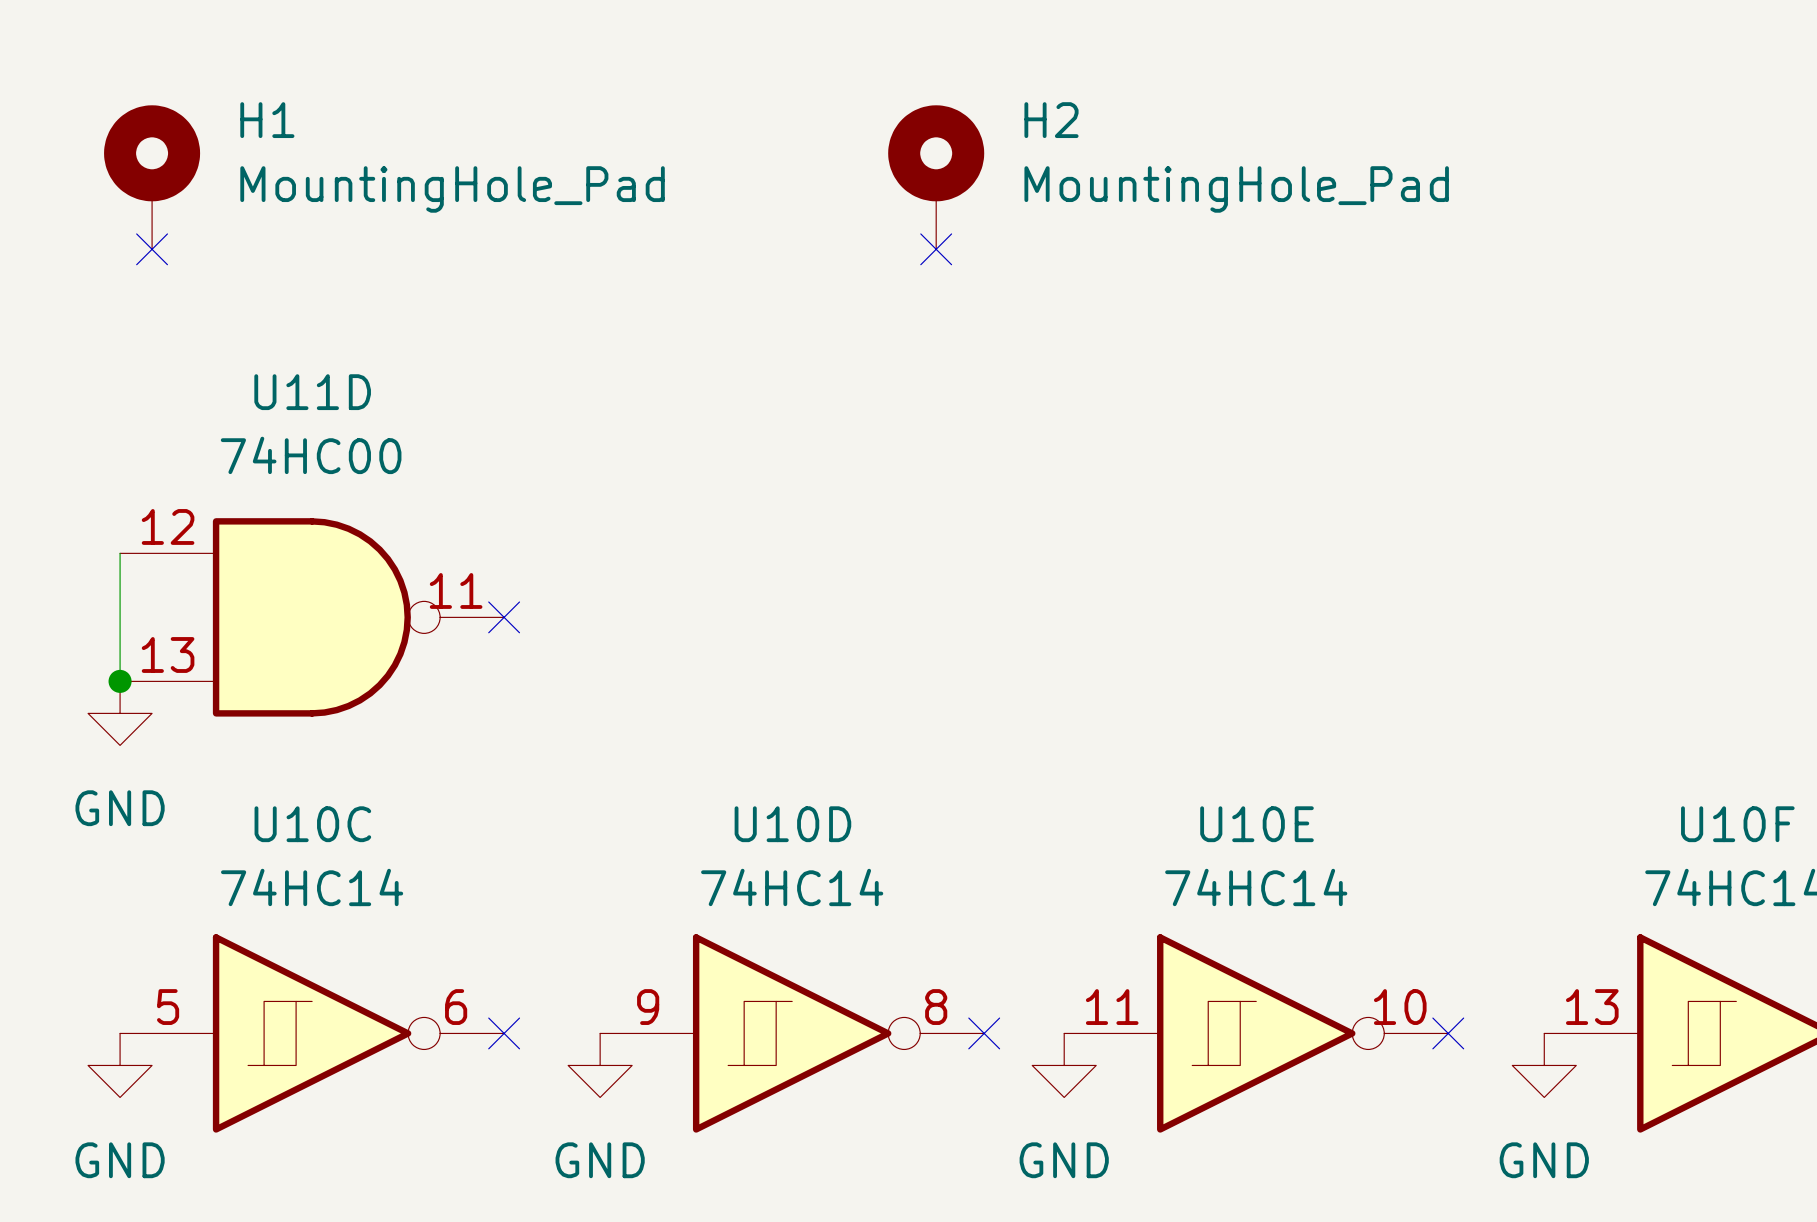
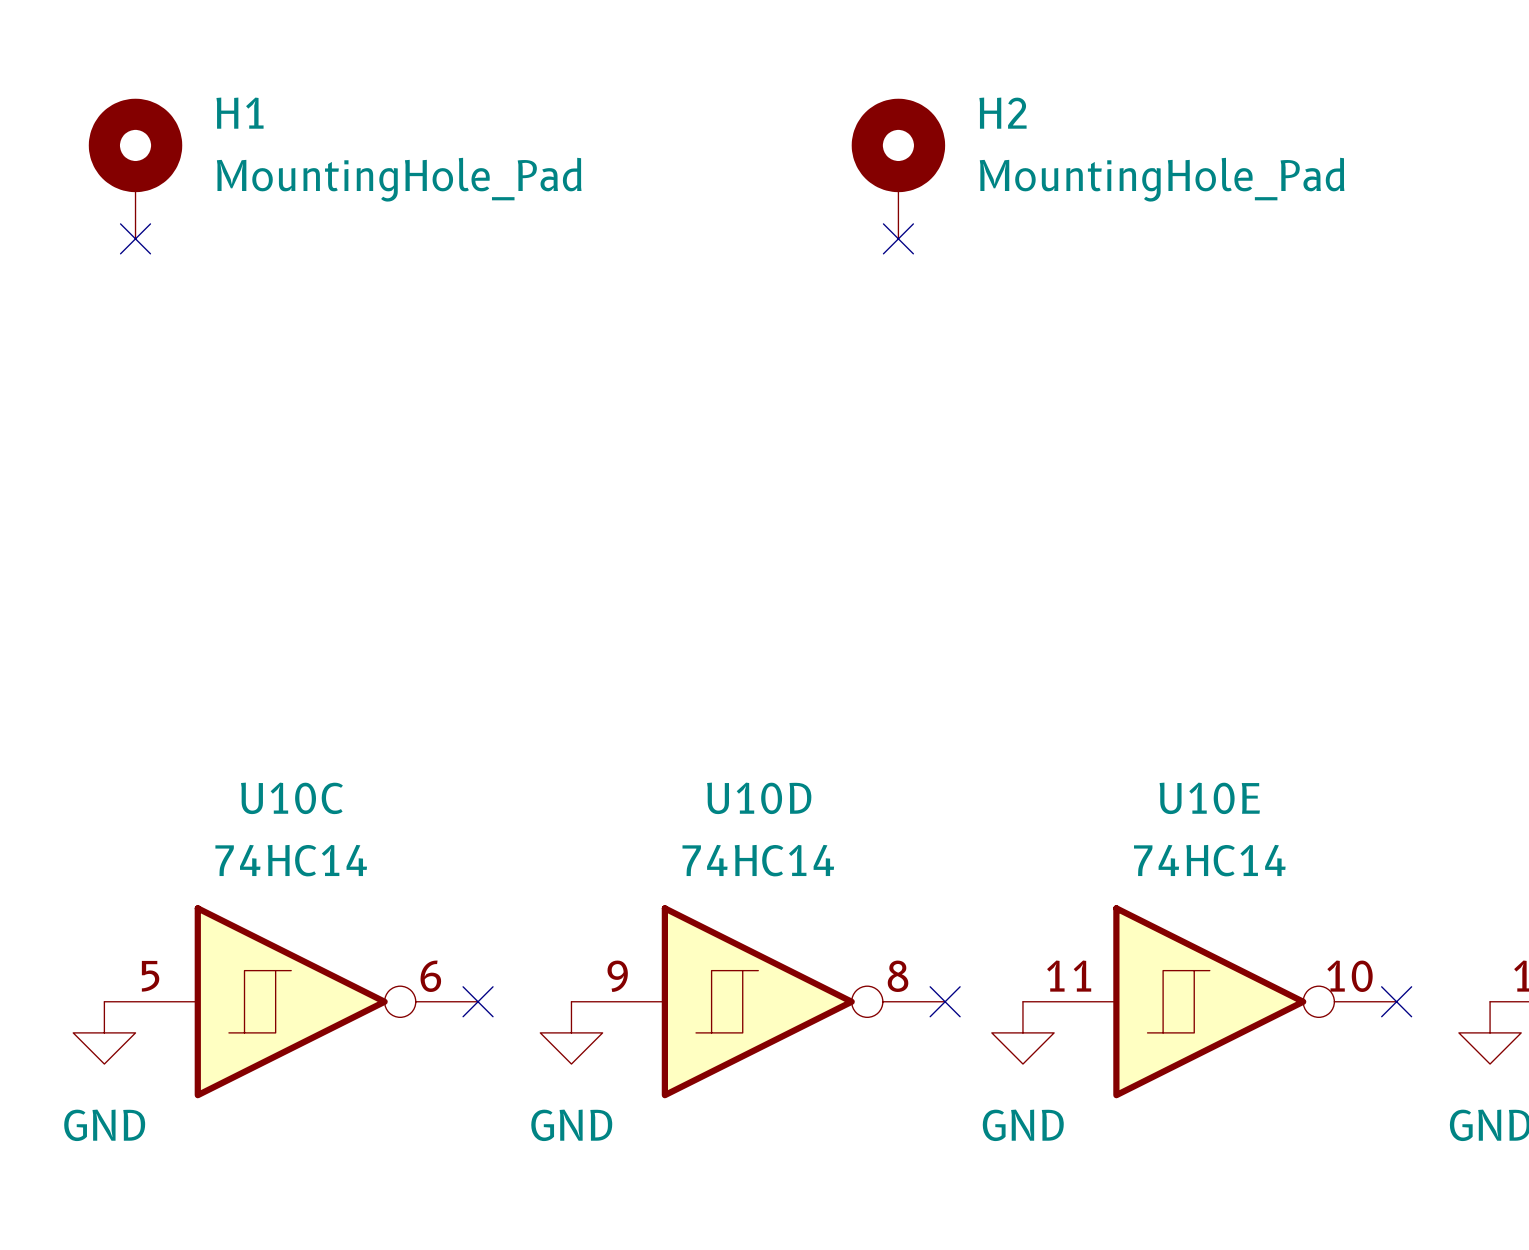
wire: (120, 553) (120, 681) -> none
U11D: 74HC00 (312, 617) -> none
no-connect mark: (504, 617) -> none
junction: (120, 681) -> none
power symbol: GND (120, 713) -> none

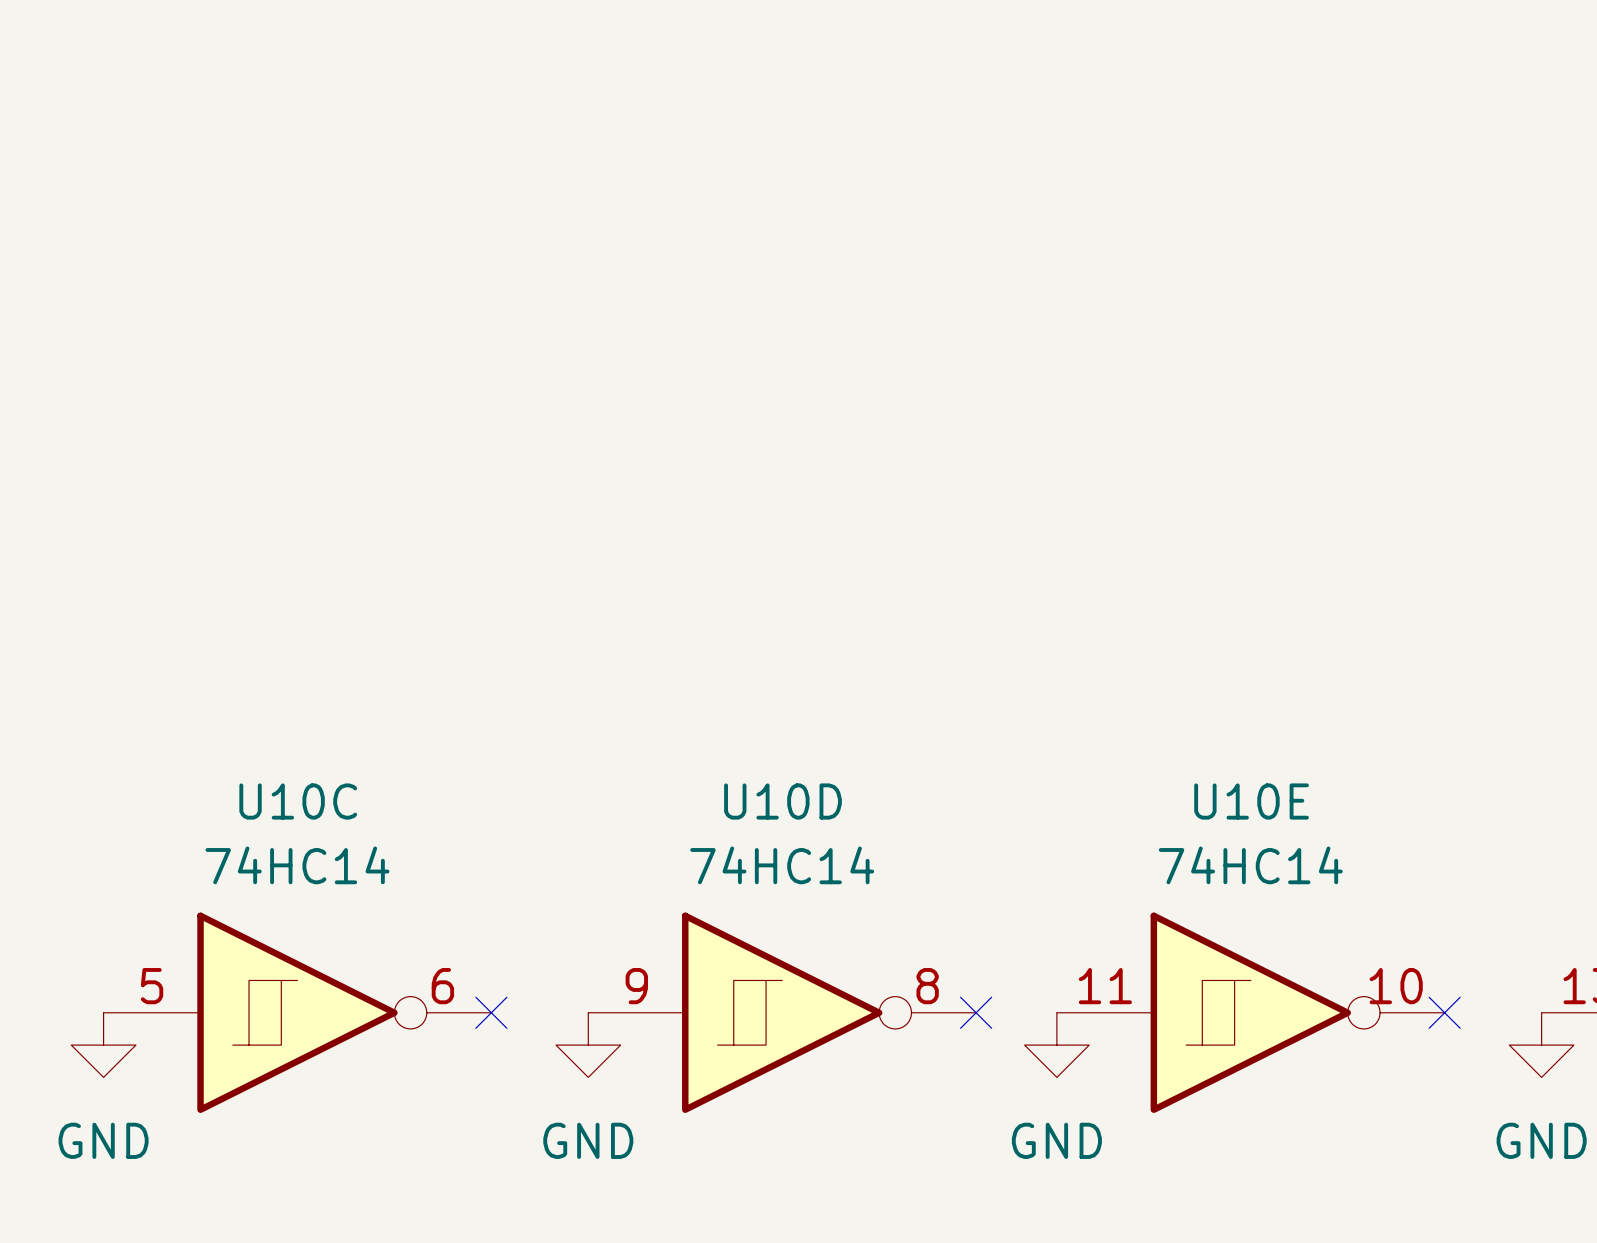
H1: MountingHole_Pad (135, 168) -> none
H2: MountingHole_Pad (898, 168) -> none
no-connect mark: (135, 238) -> none
no-connect mark: (898, 238) -> none

